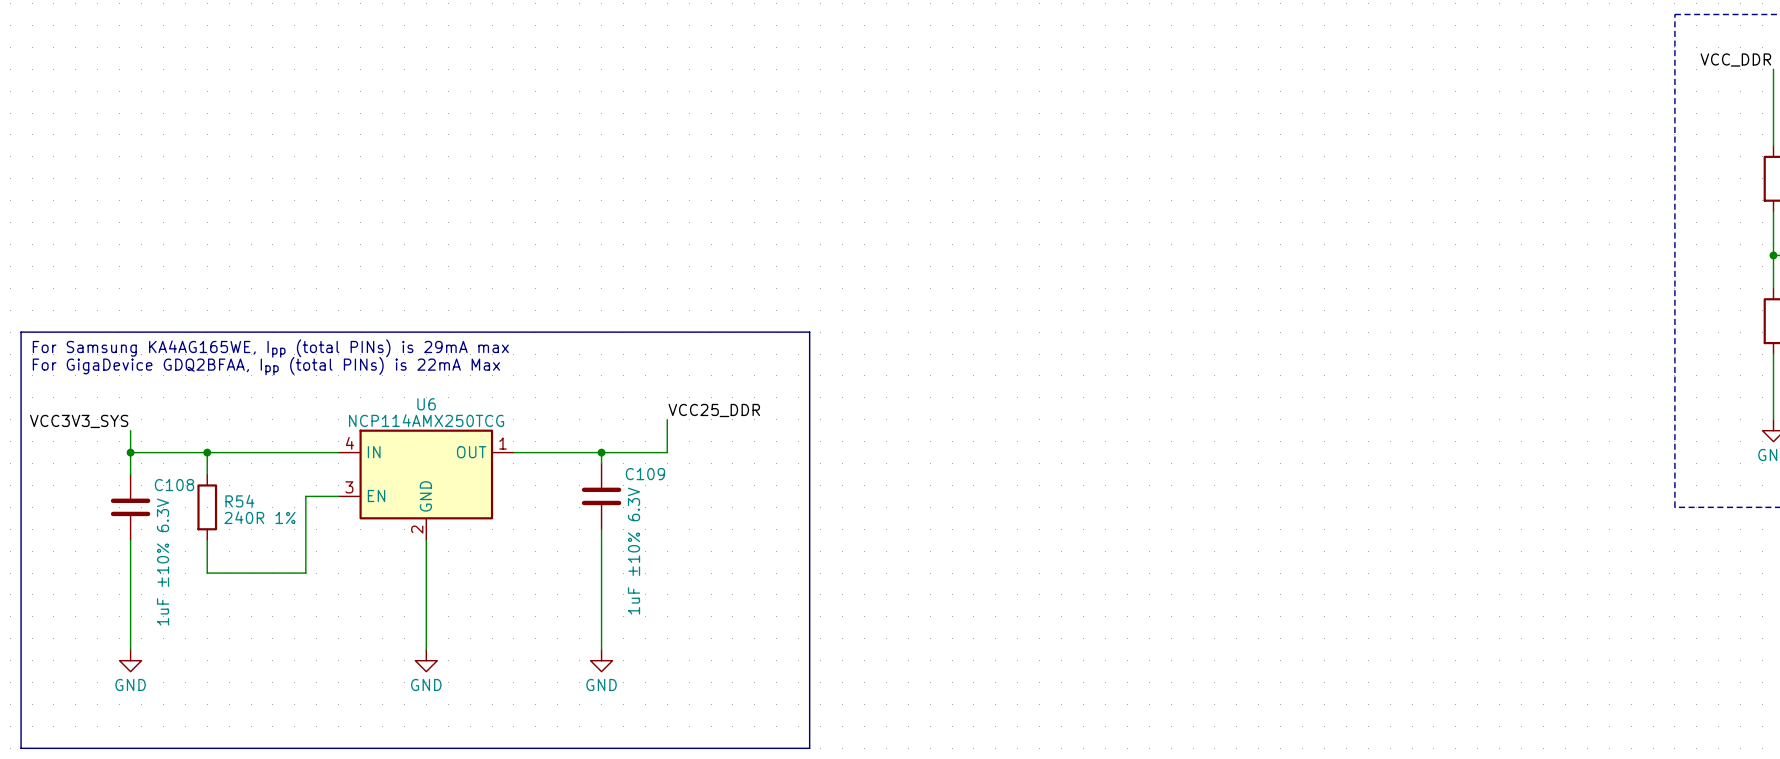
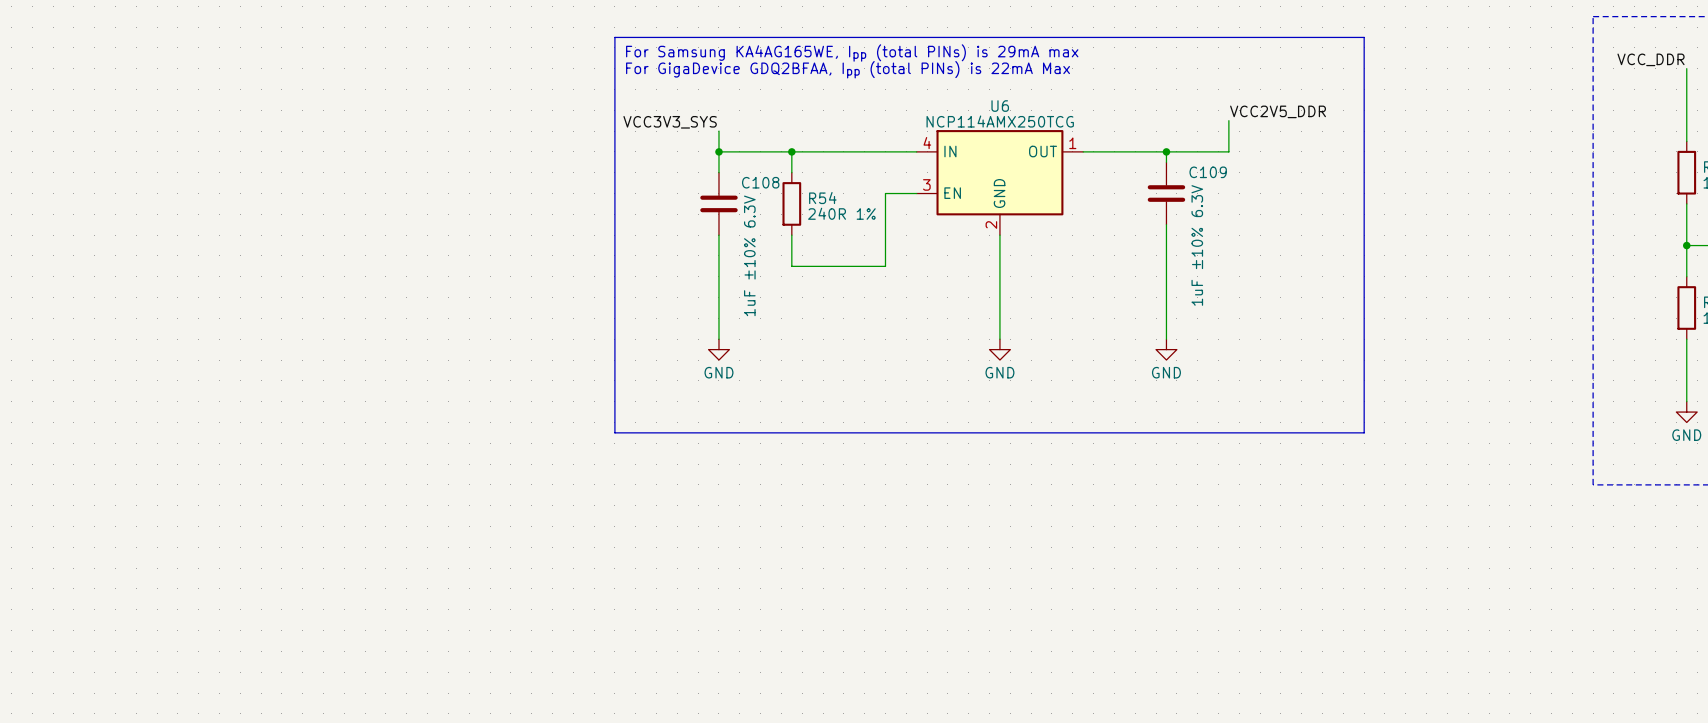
line: none -> (614, 37) (1364, 37) (1364, 432) (614, 432) (614, 37)
text: none -> For Samsung KA4AG165WE, Ipp (total PINs) is 29mA max (852, 52)
text: none -> For GigaDevice GDQ2BFAA, Ipp (total PINs) is 22mA Max (848, 69)
label: none -> VCC2V5_DDR (1278, 111)
wire: none -> (1228, 120) (1228, 151) (1083, 151)
label: none -> VCC3V3_SYS (670, 122)
wire: none -> (718, 131) (718, 172)
wire: none -> (718, 151) (916, 151)
junction: none -> (718, 151)
wire: none -> (791, 151) (791, 172)
junction: none -> (791, 151)
wire: none -> (1166, 151) (1166, 162)
junction: none -> (1166, 151)
wire: none -> (916, 193) (885, 193) (885, 266) (791, 266) (791, 235)
wire: none -> (1166, 224) (1166, 339)
wire: none -> (718, 235) (718, 339)
wire: none -> (999, 235) (999, 339)
line: (21, 332) (809, 332) (809, 748) (21, 748) (21, 332) -> none
text: For Samsung KA4AG165WE, Ipp (total PINs) is 29mA max (270, 348) -> none
power symbol: none -> GND (718, 349)
power symbol: none -> GND (999, 349)
power symbol: none -> GND (1166, 349)
text: For GigaDevice GDQ2BFAA, Ipp (total PINs) is 22mA Max (266, 366) -> none
label: VCC25_DDR (714, 410) -> none
wire: (667, 419) (667, 452) (513, 452) -> none
label: VCC3V3_SYS (79, 421) -> none
wire: (130, 430) (130, 474) -> none
wire: (130, 452) (338, 452) -> none
junction: (130, 452) -> none
wire: (207, 452) (207, 474) -> none
junction: (207, 452) -> none
wire: (601, 452) (601, 463) -> none
junction: (601, 452) -> none
U6 position: (426, 484) -> (999, 182)
wire: (338, 496) (305, 496) (305, 573) (207, 573) (207, 540) -> none
C109 position: (601, 496) -> (1166, 193)
C108 position: (130, 507) -> (718, 203)
R54 position: (207, 507) -> (791, 203)
wire: (601, 529) (601, 649) -> none
wire: (130, 540) (130, 649) -> none
wire: (426, 540) (426, 649) -> none
power symbol: GND (130, 660) -> none
power symbol: GND (426, 660) -> none
power symbol: GND (601, 660) -> none

